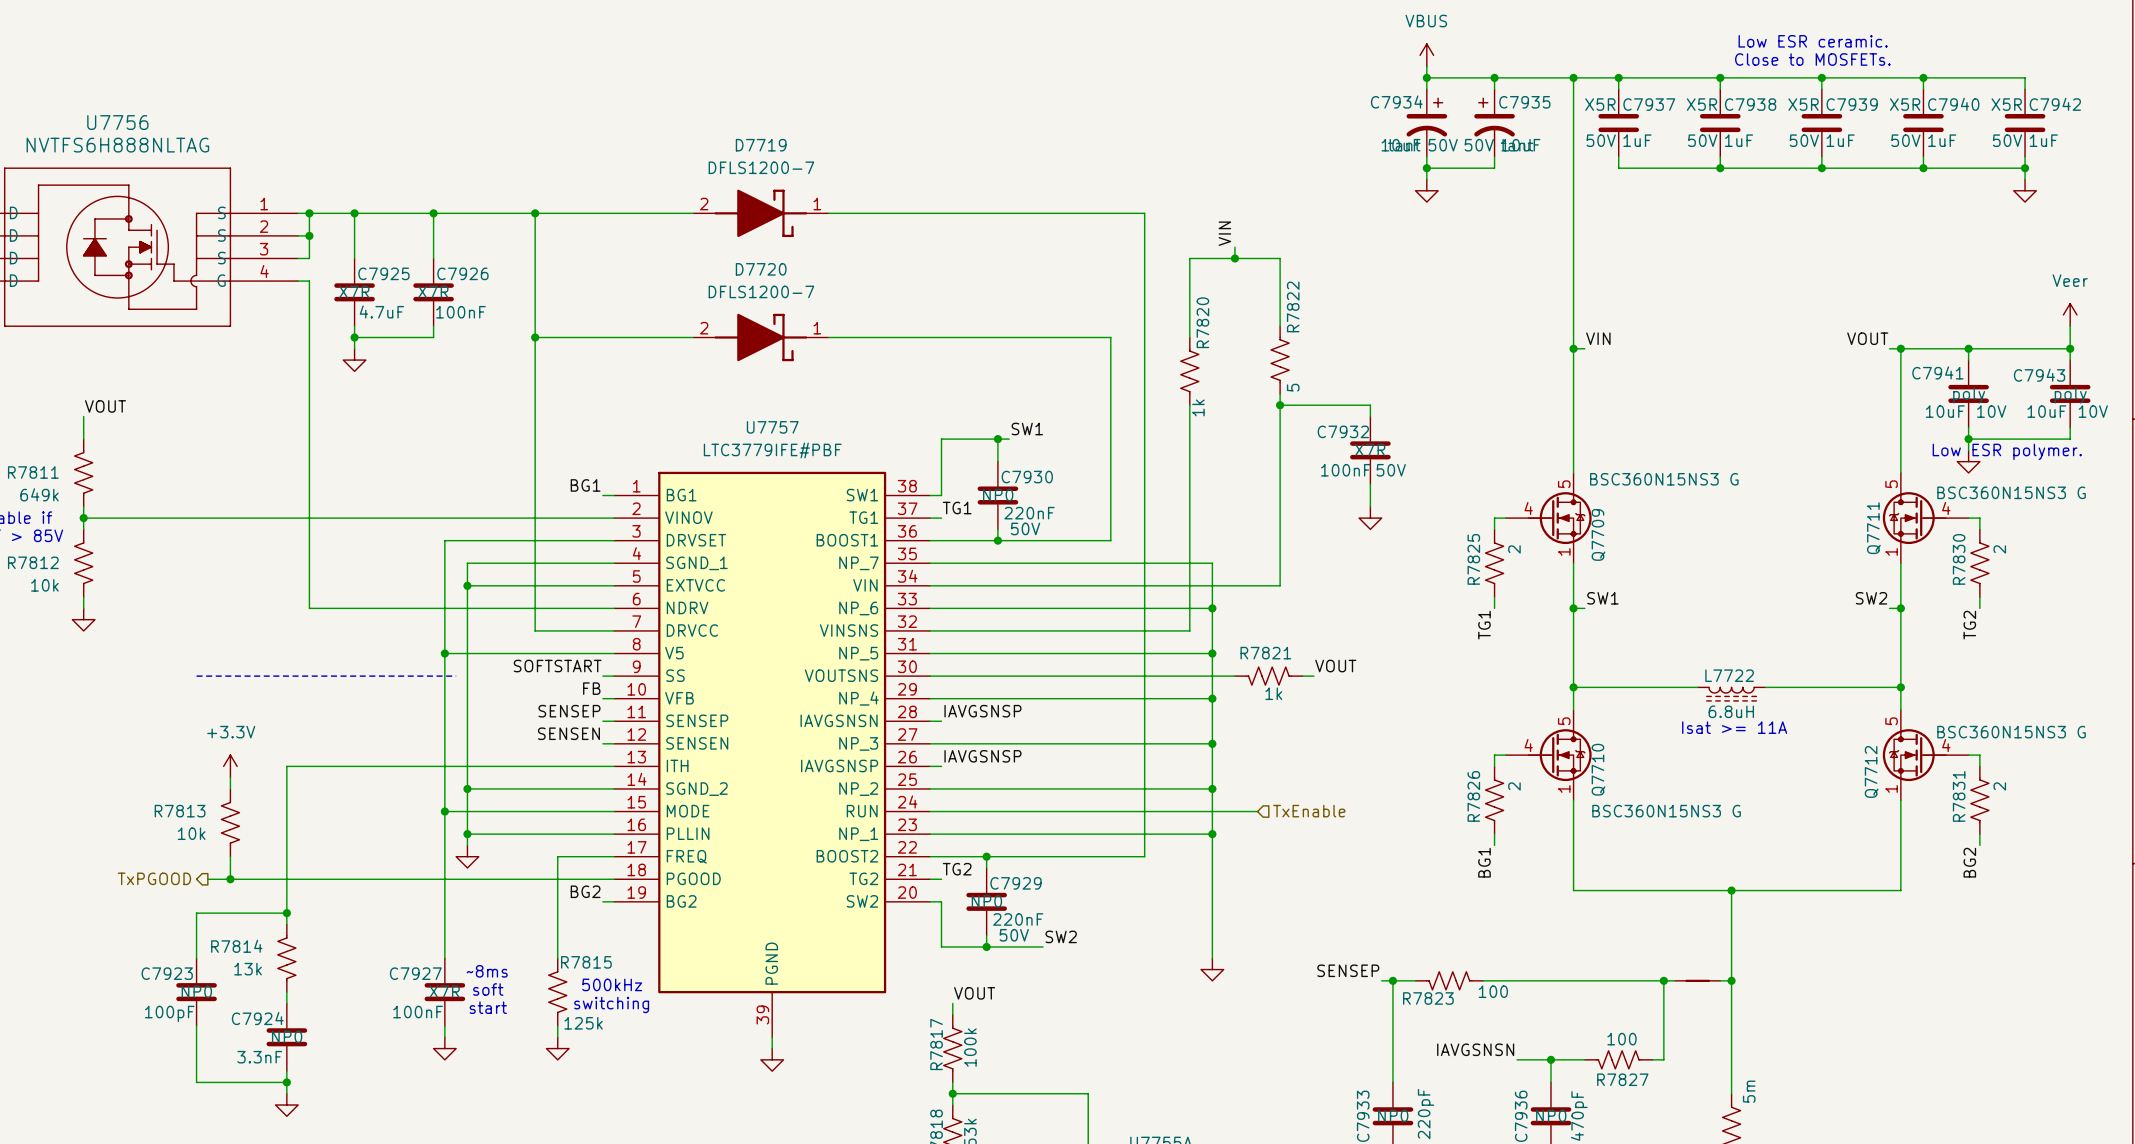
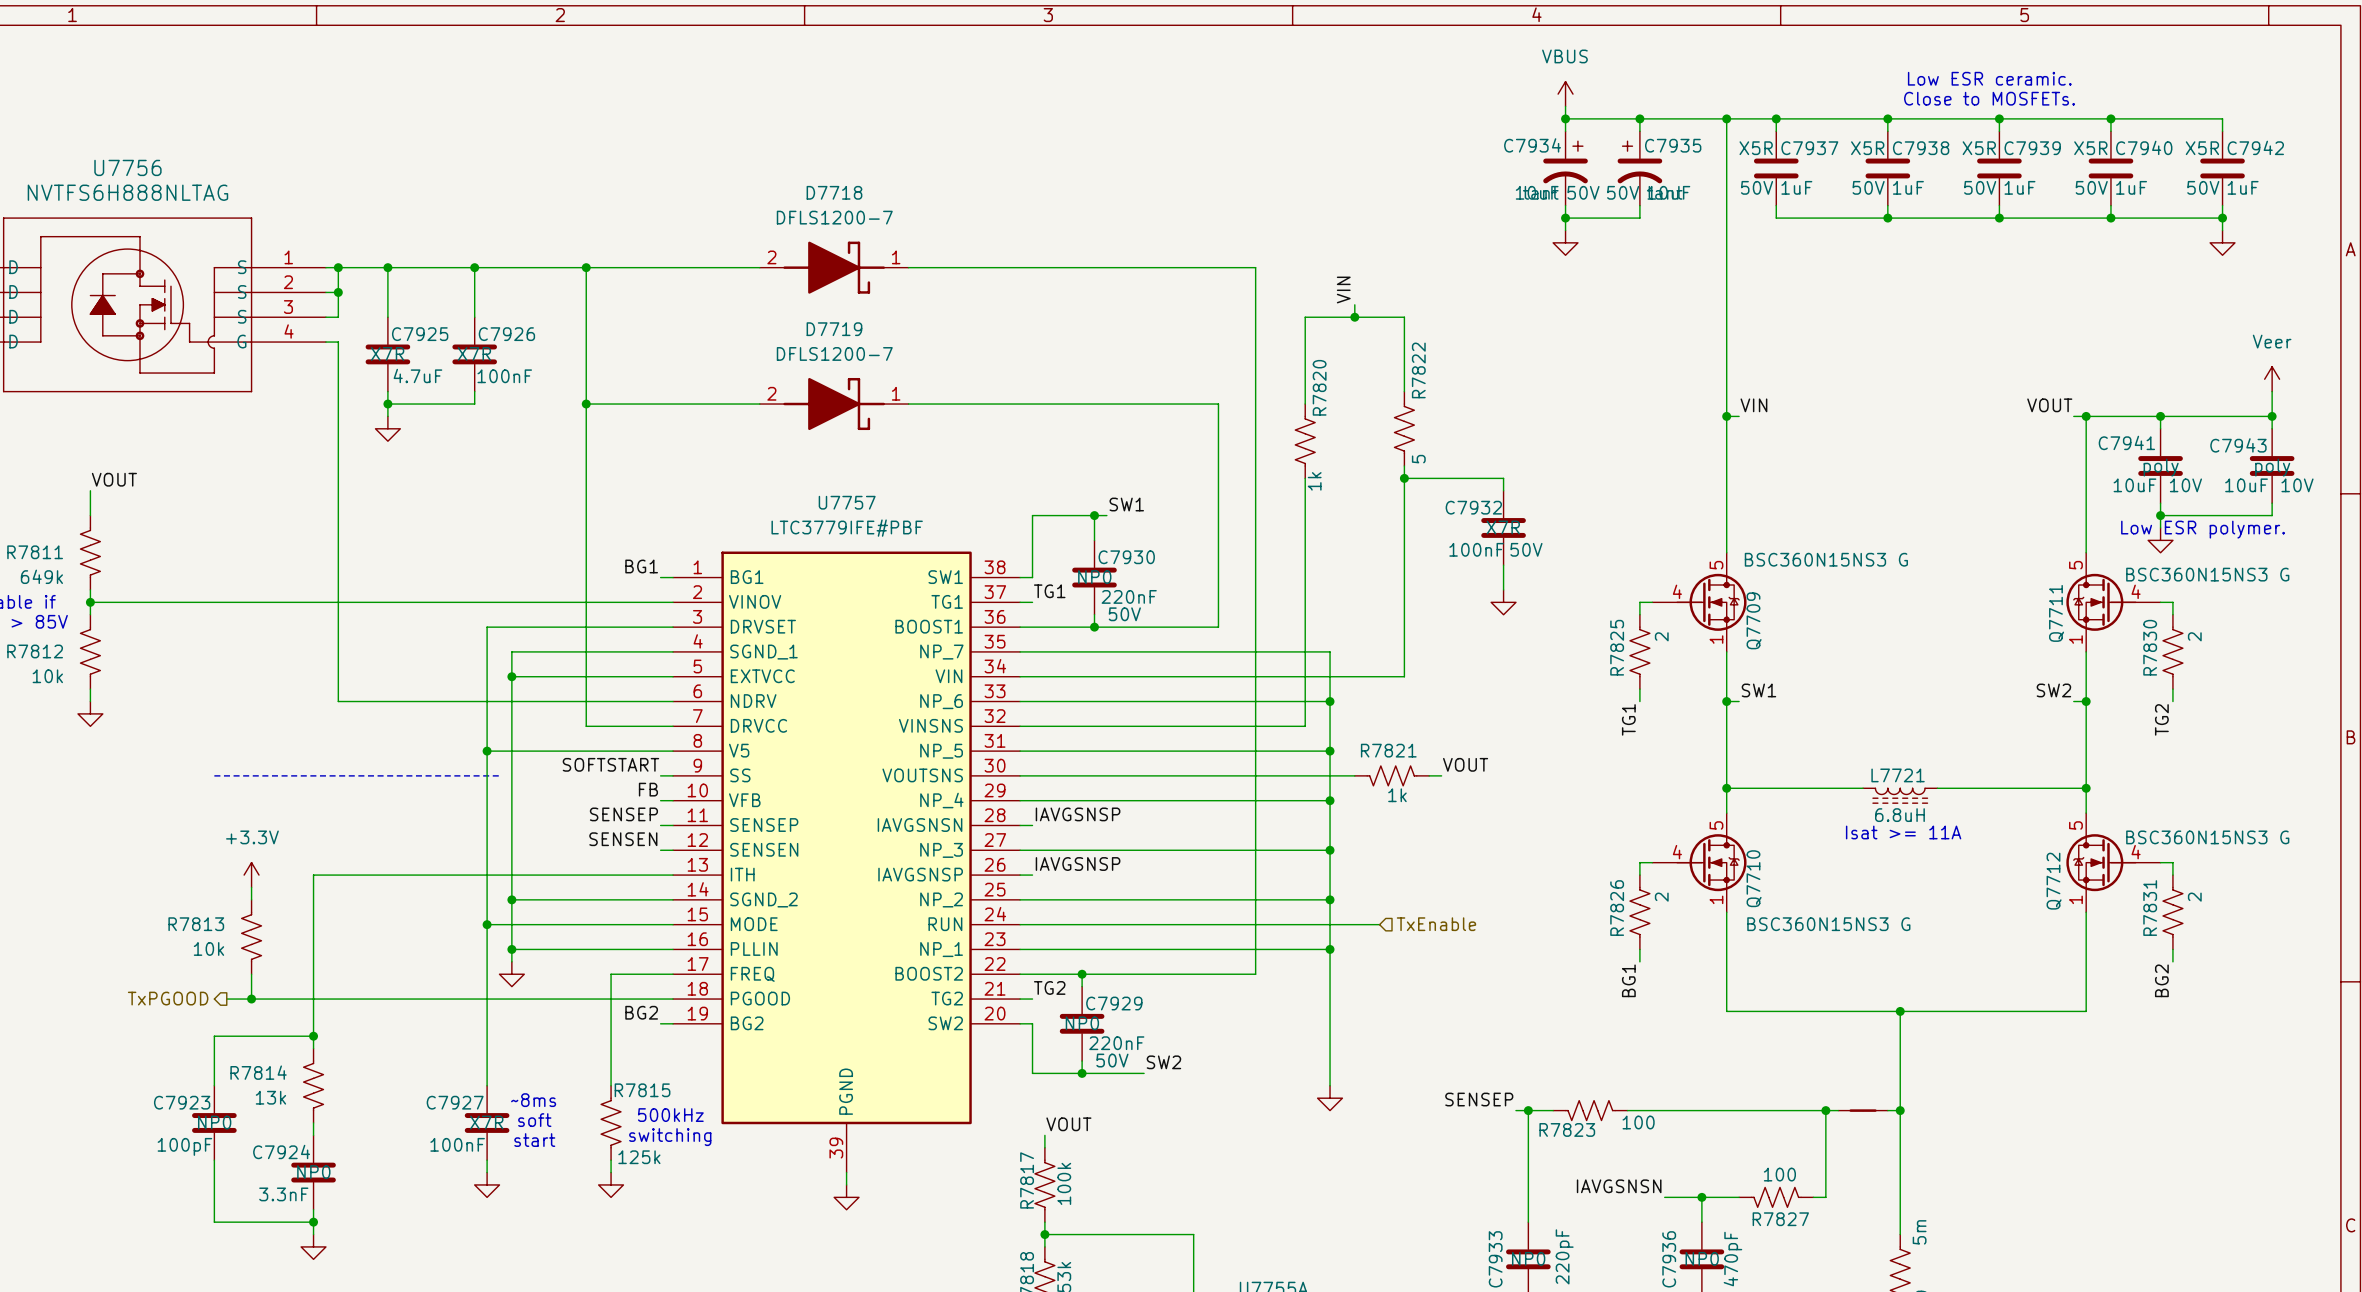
D7719 name: D7719 (761, 145) -> D7718 (834, 192)
D7720 name: D7720 (761, 269) -> D7719 (834, 329)
L7722 name: L7722 (1729, 675) -> L7721 (1898, 775)

